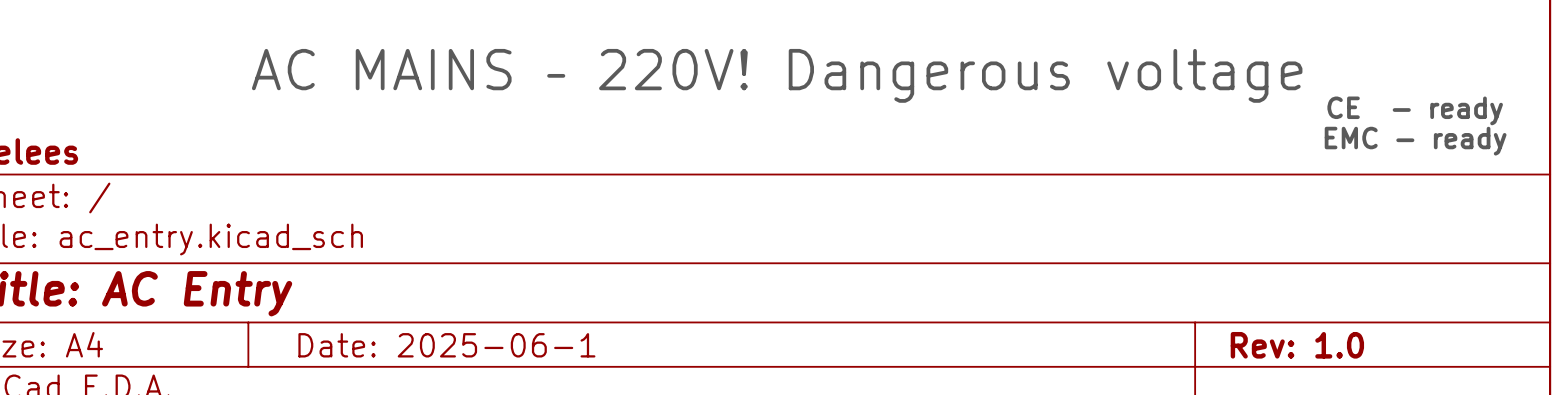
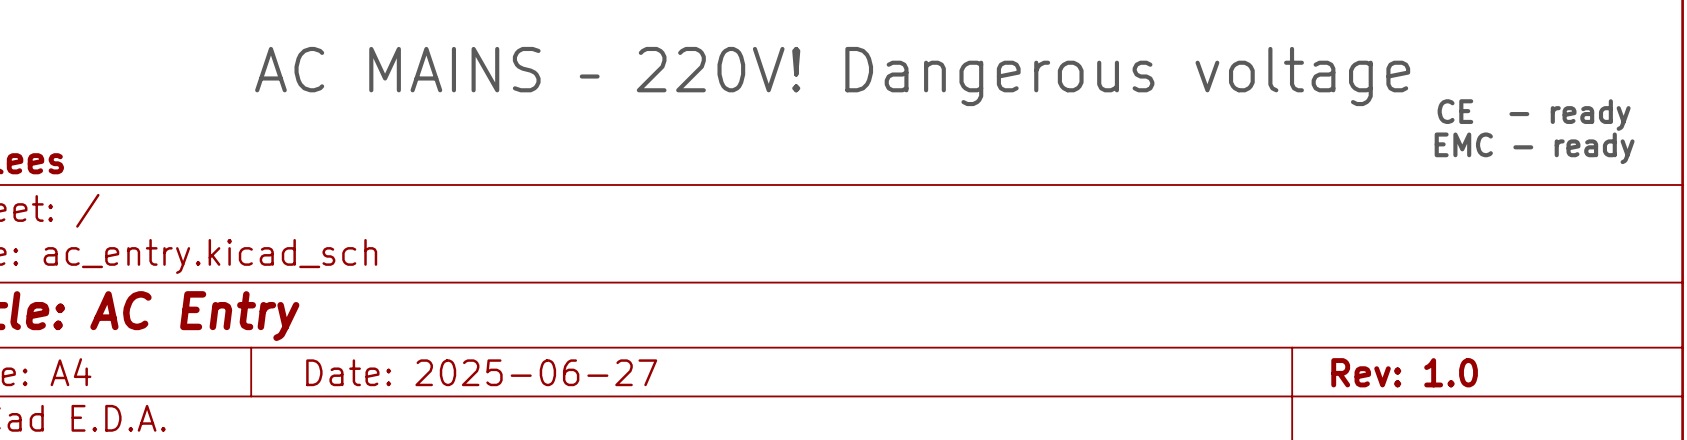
title block: Date: 2025-06-1 (446, 345) -> Date: 2025-06-27 (481, 372)

